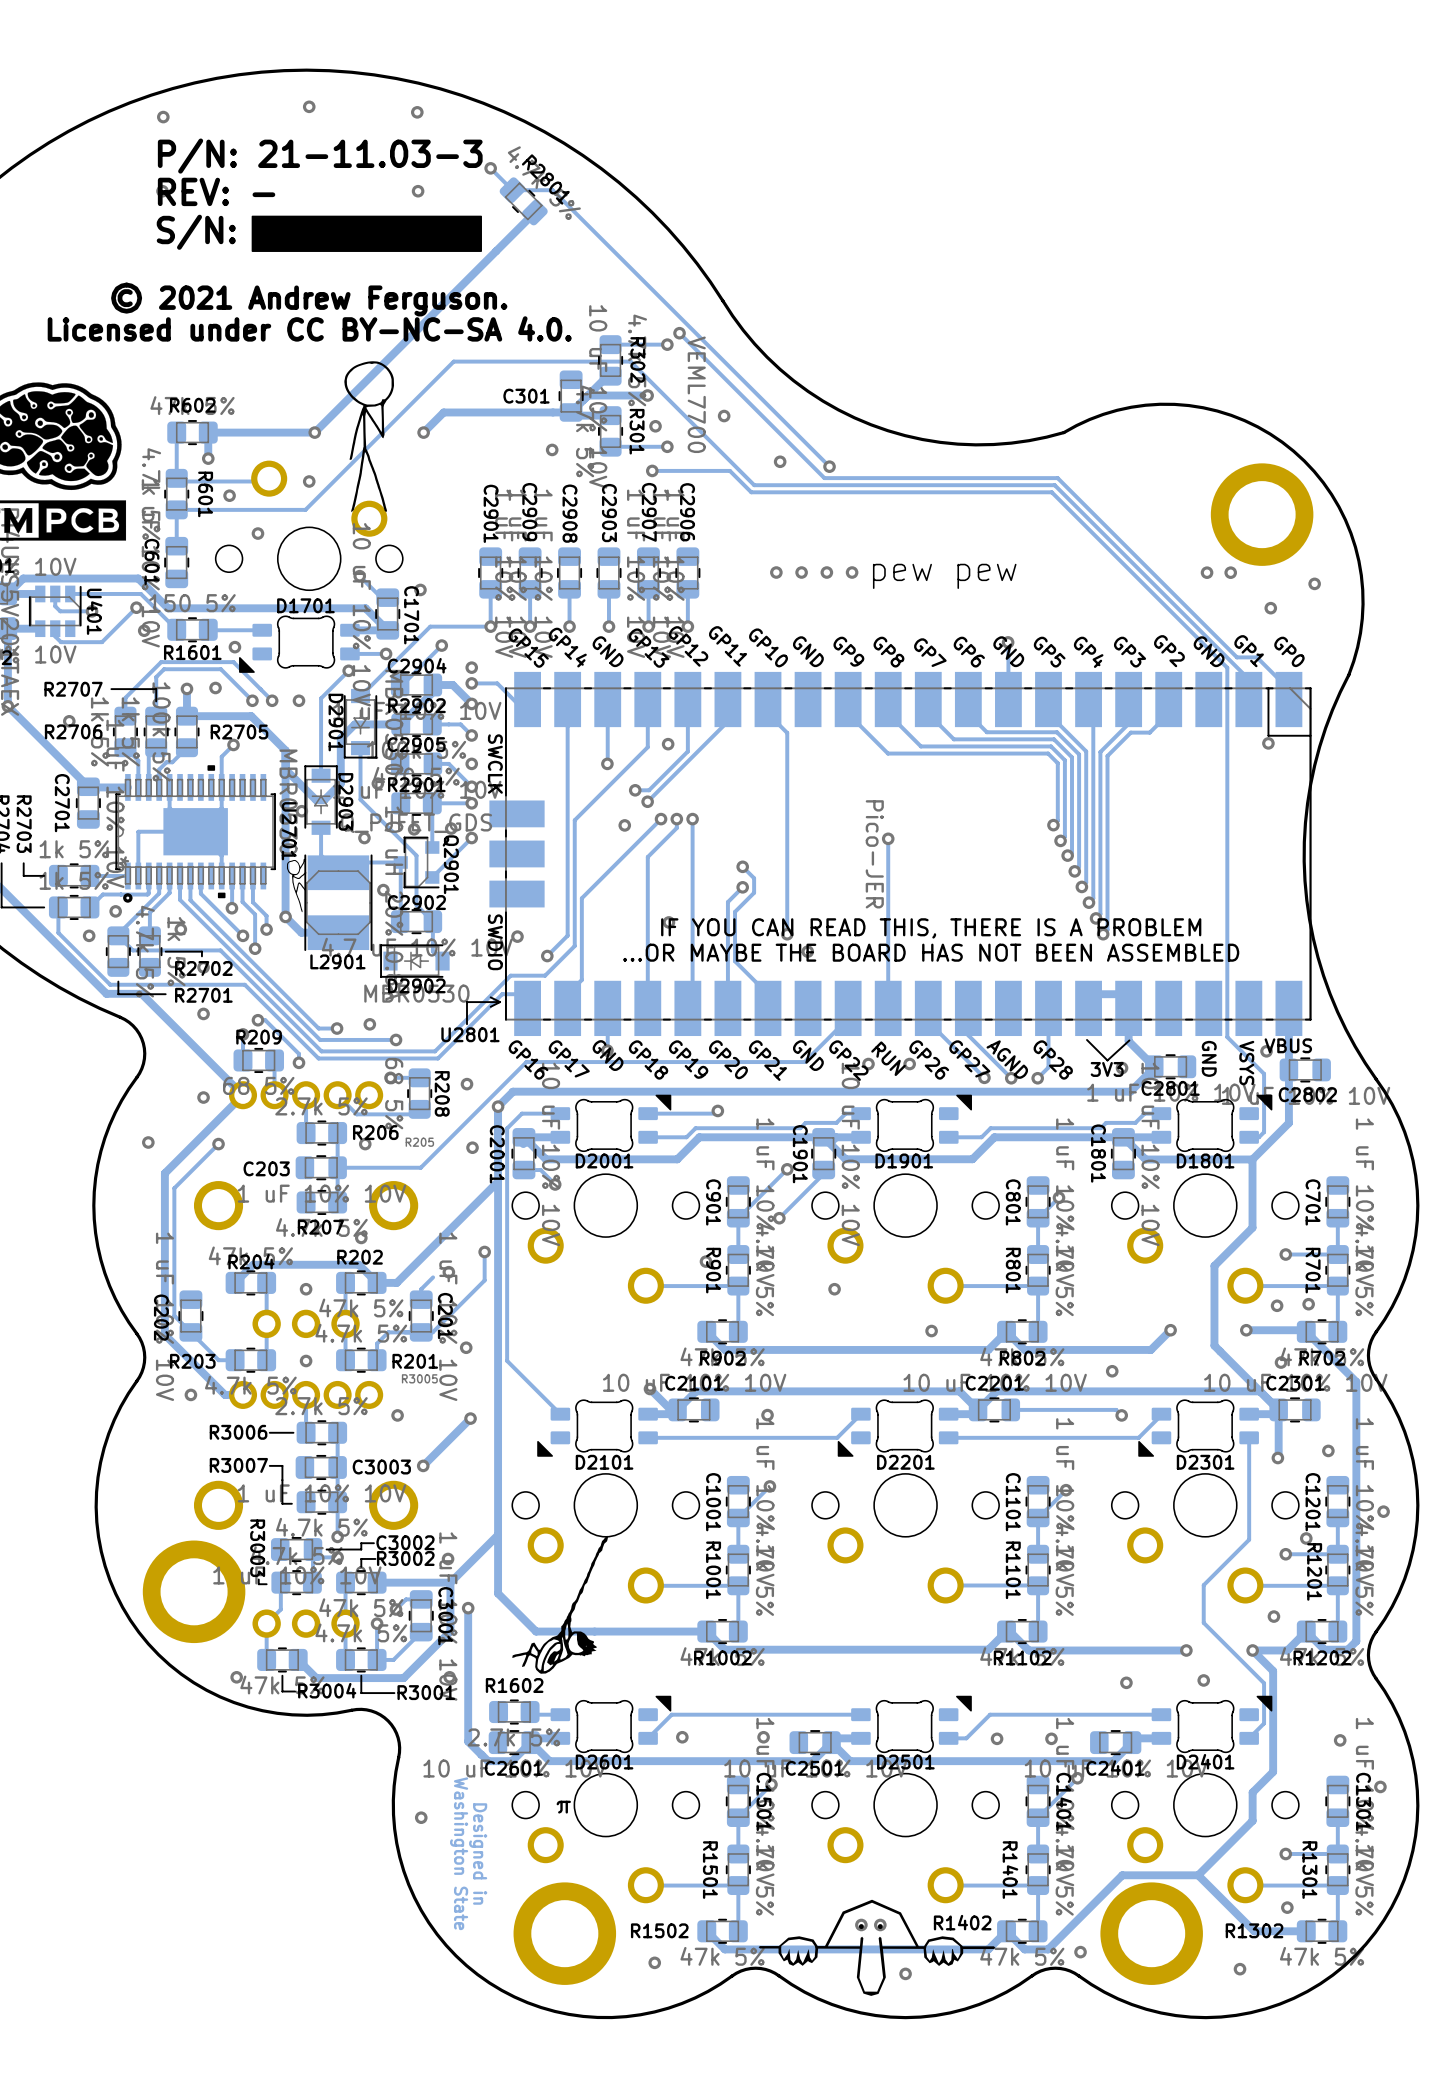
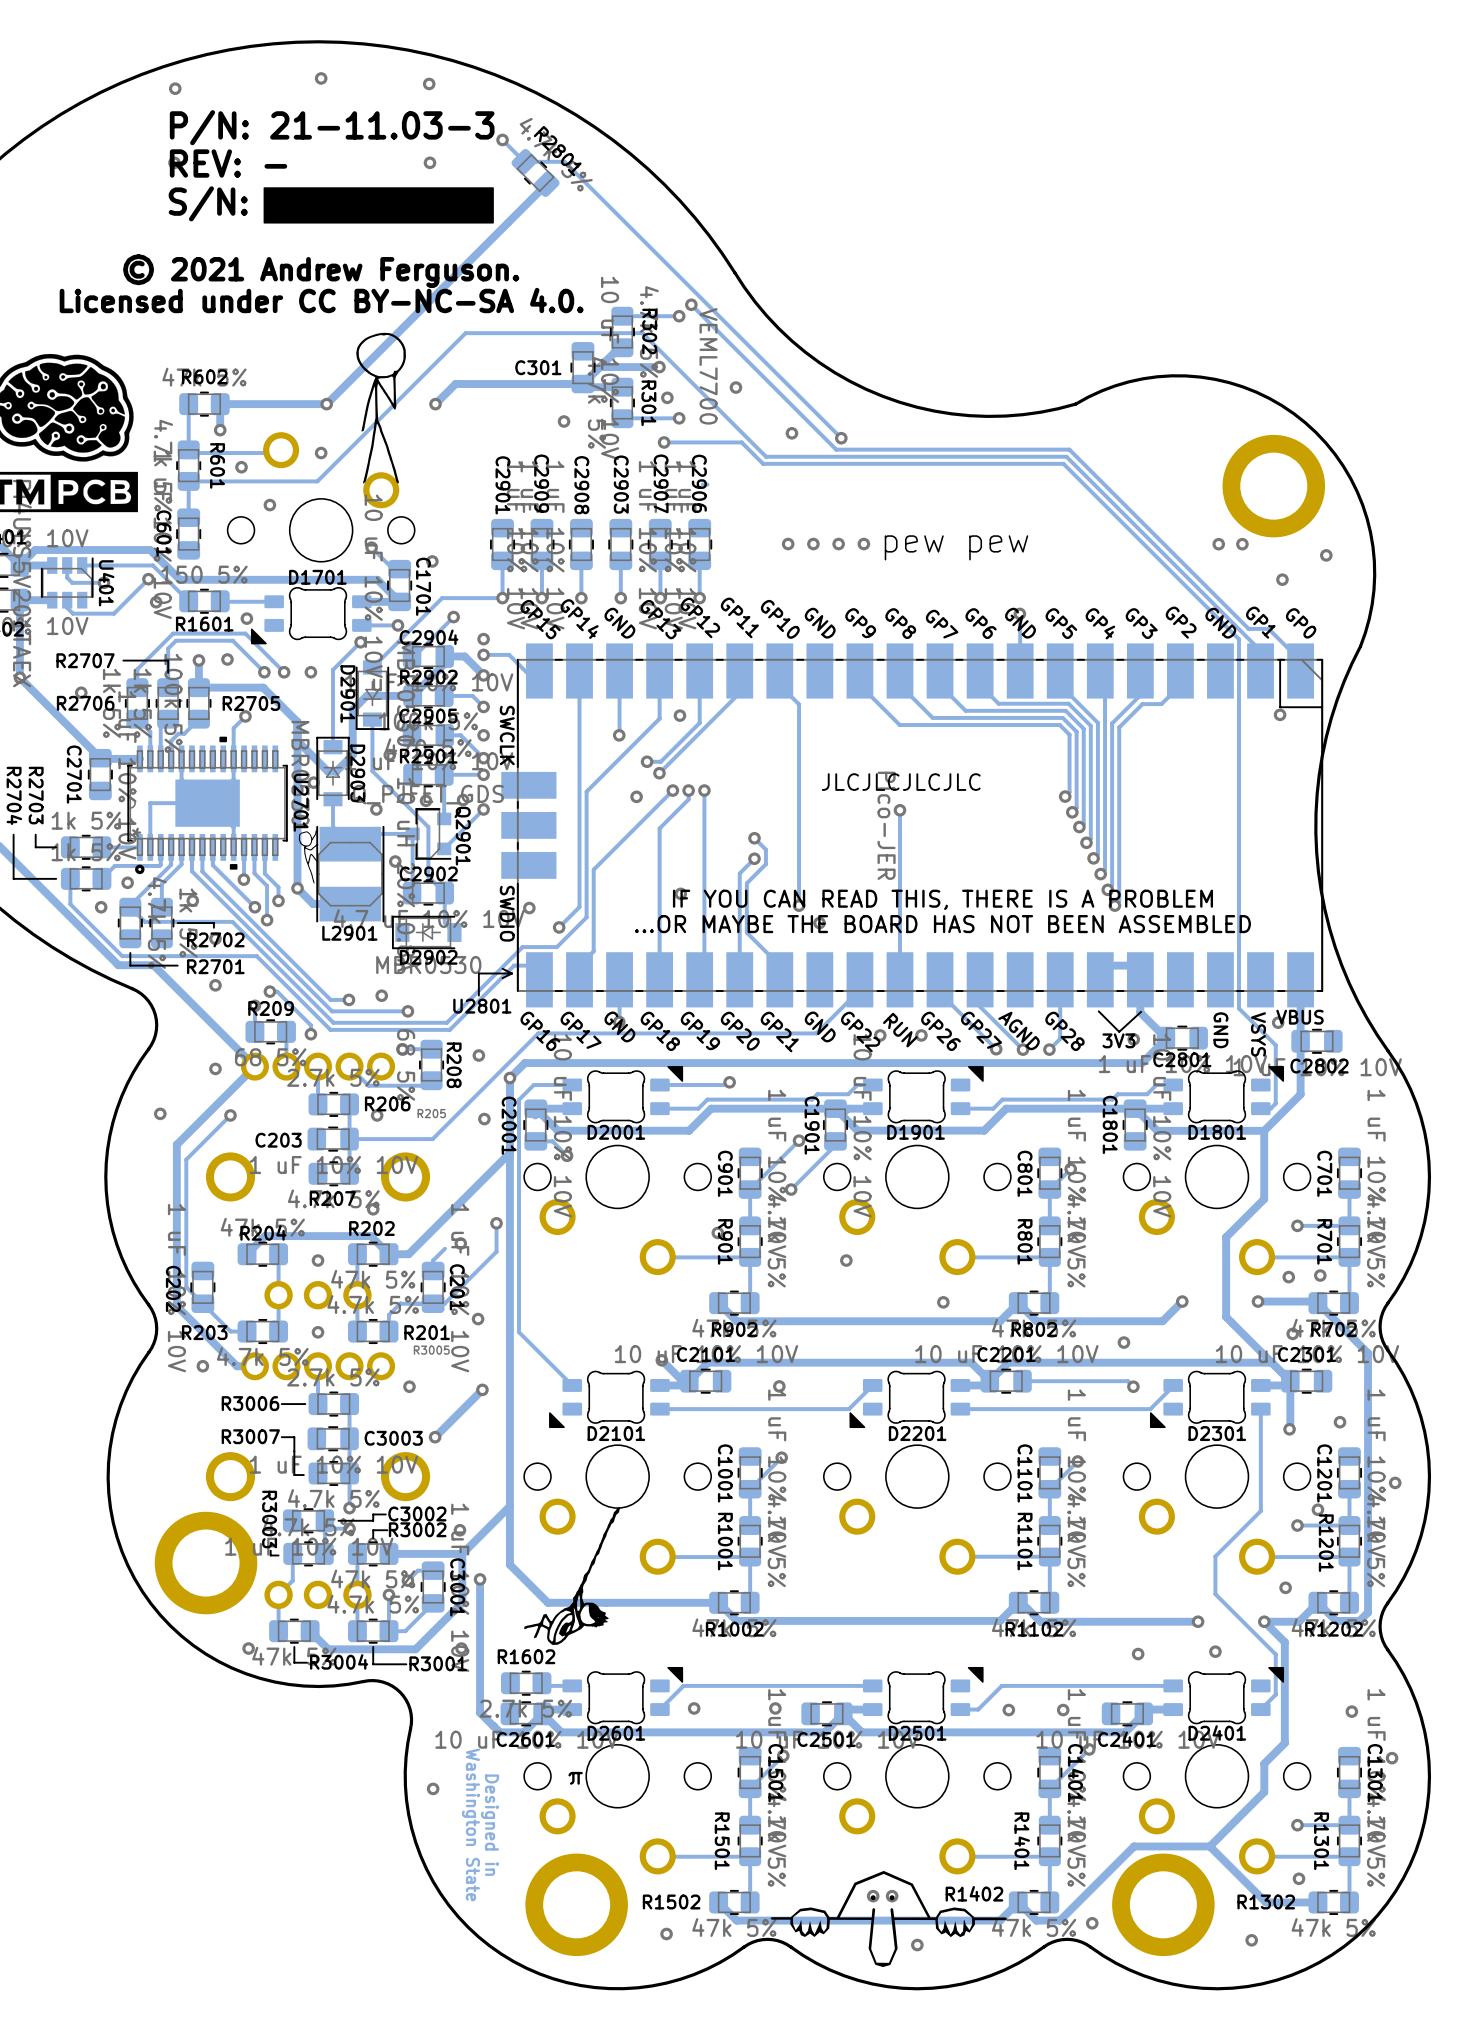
track: none -> (707, 484) (702, 484)
text: none -> JLCJLCJLCJLC (901, 782)

